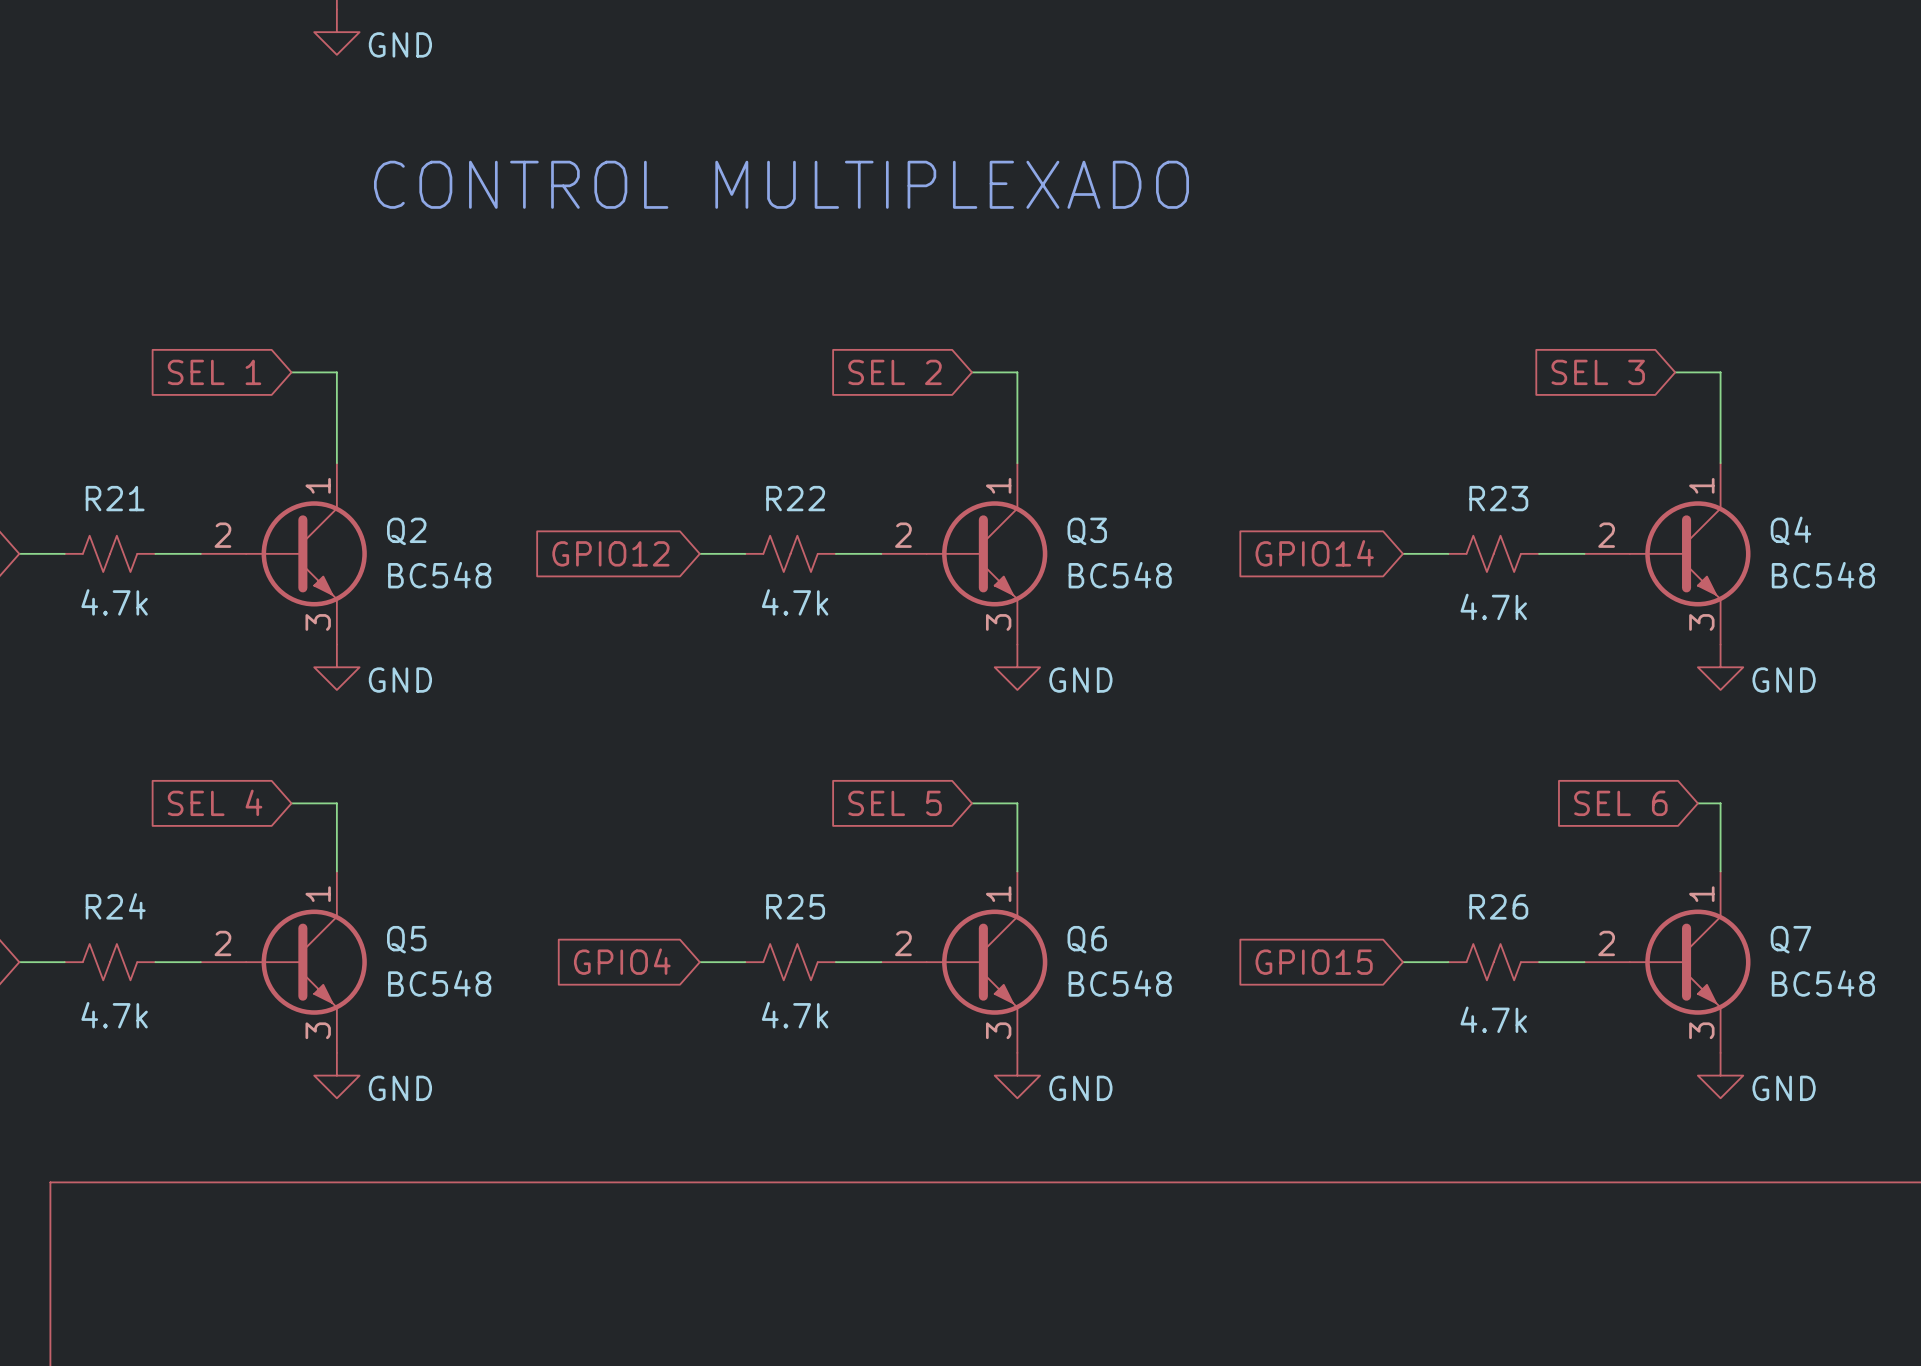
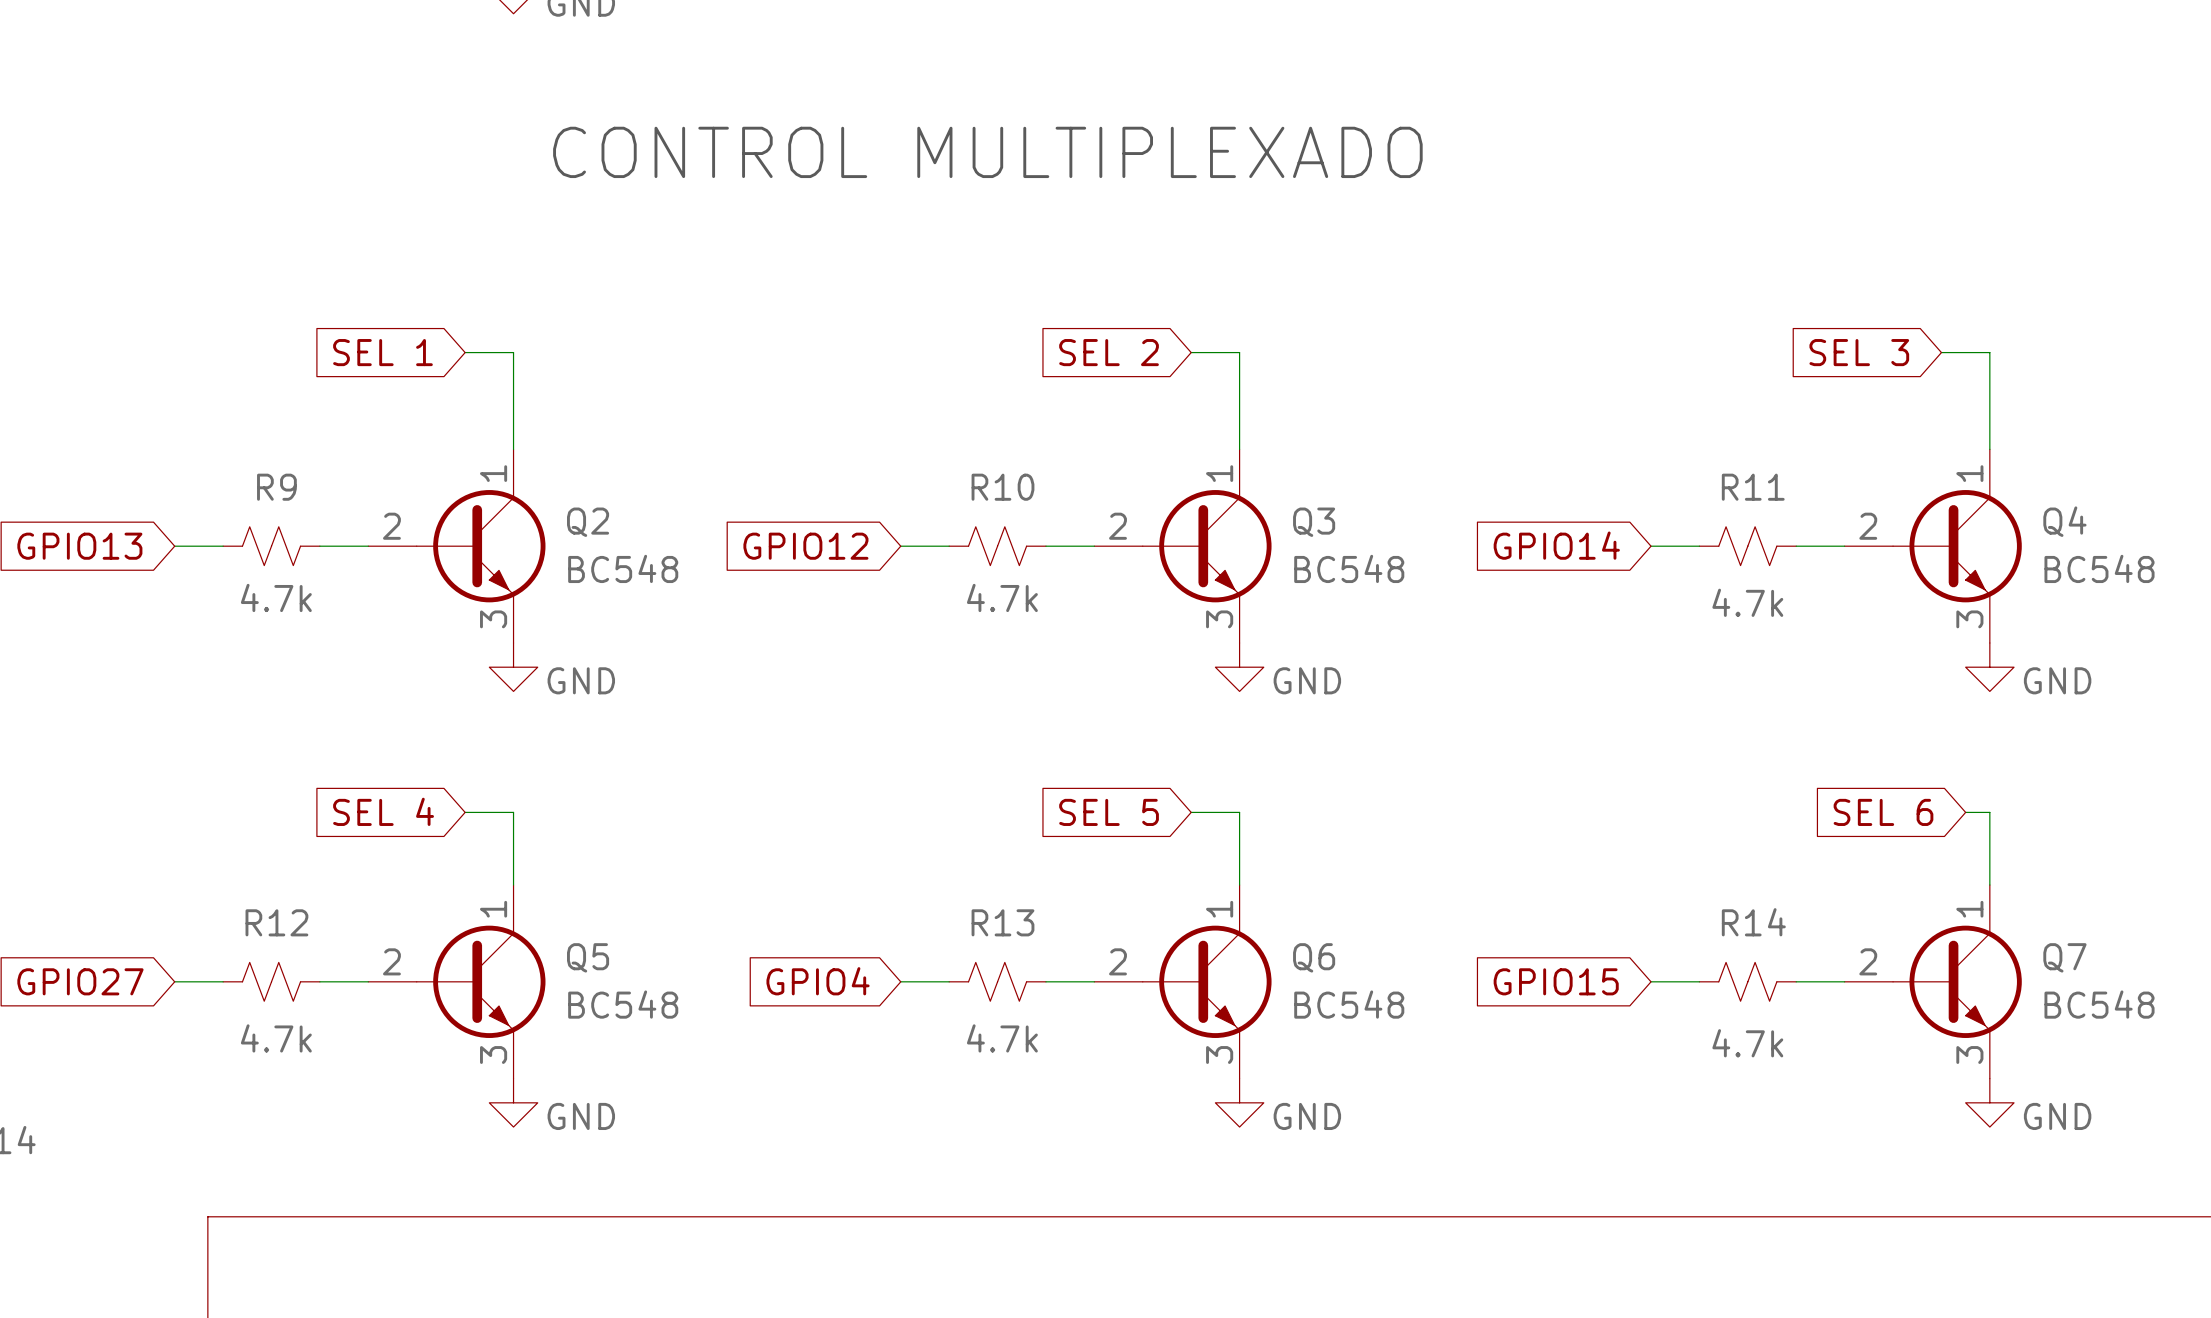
R21 name: R21 (115, 498) -> R9 (276, 487)
R22 name: R22 (795, 498) -> R10 (1002, 487)
R23 name: R23 (1498, 498) -> R11 (1753, 487)
R24 name: R24 (115, 906) -> R12 (276, 922)
R25 name: R25 (795, 906) -> R13 (1002, 922)
R26 name: R26 (1498, 906) -> R14 (1753, 922)

